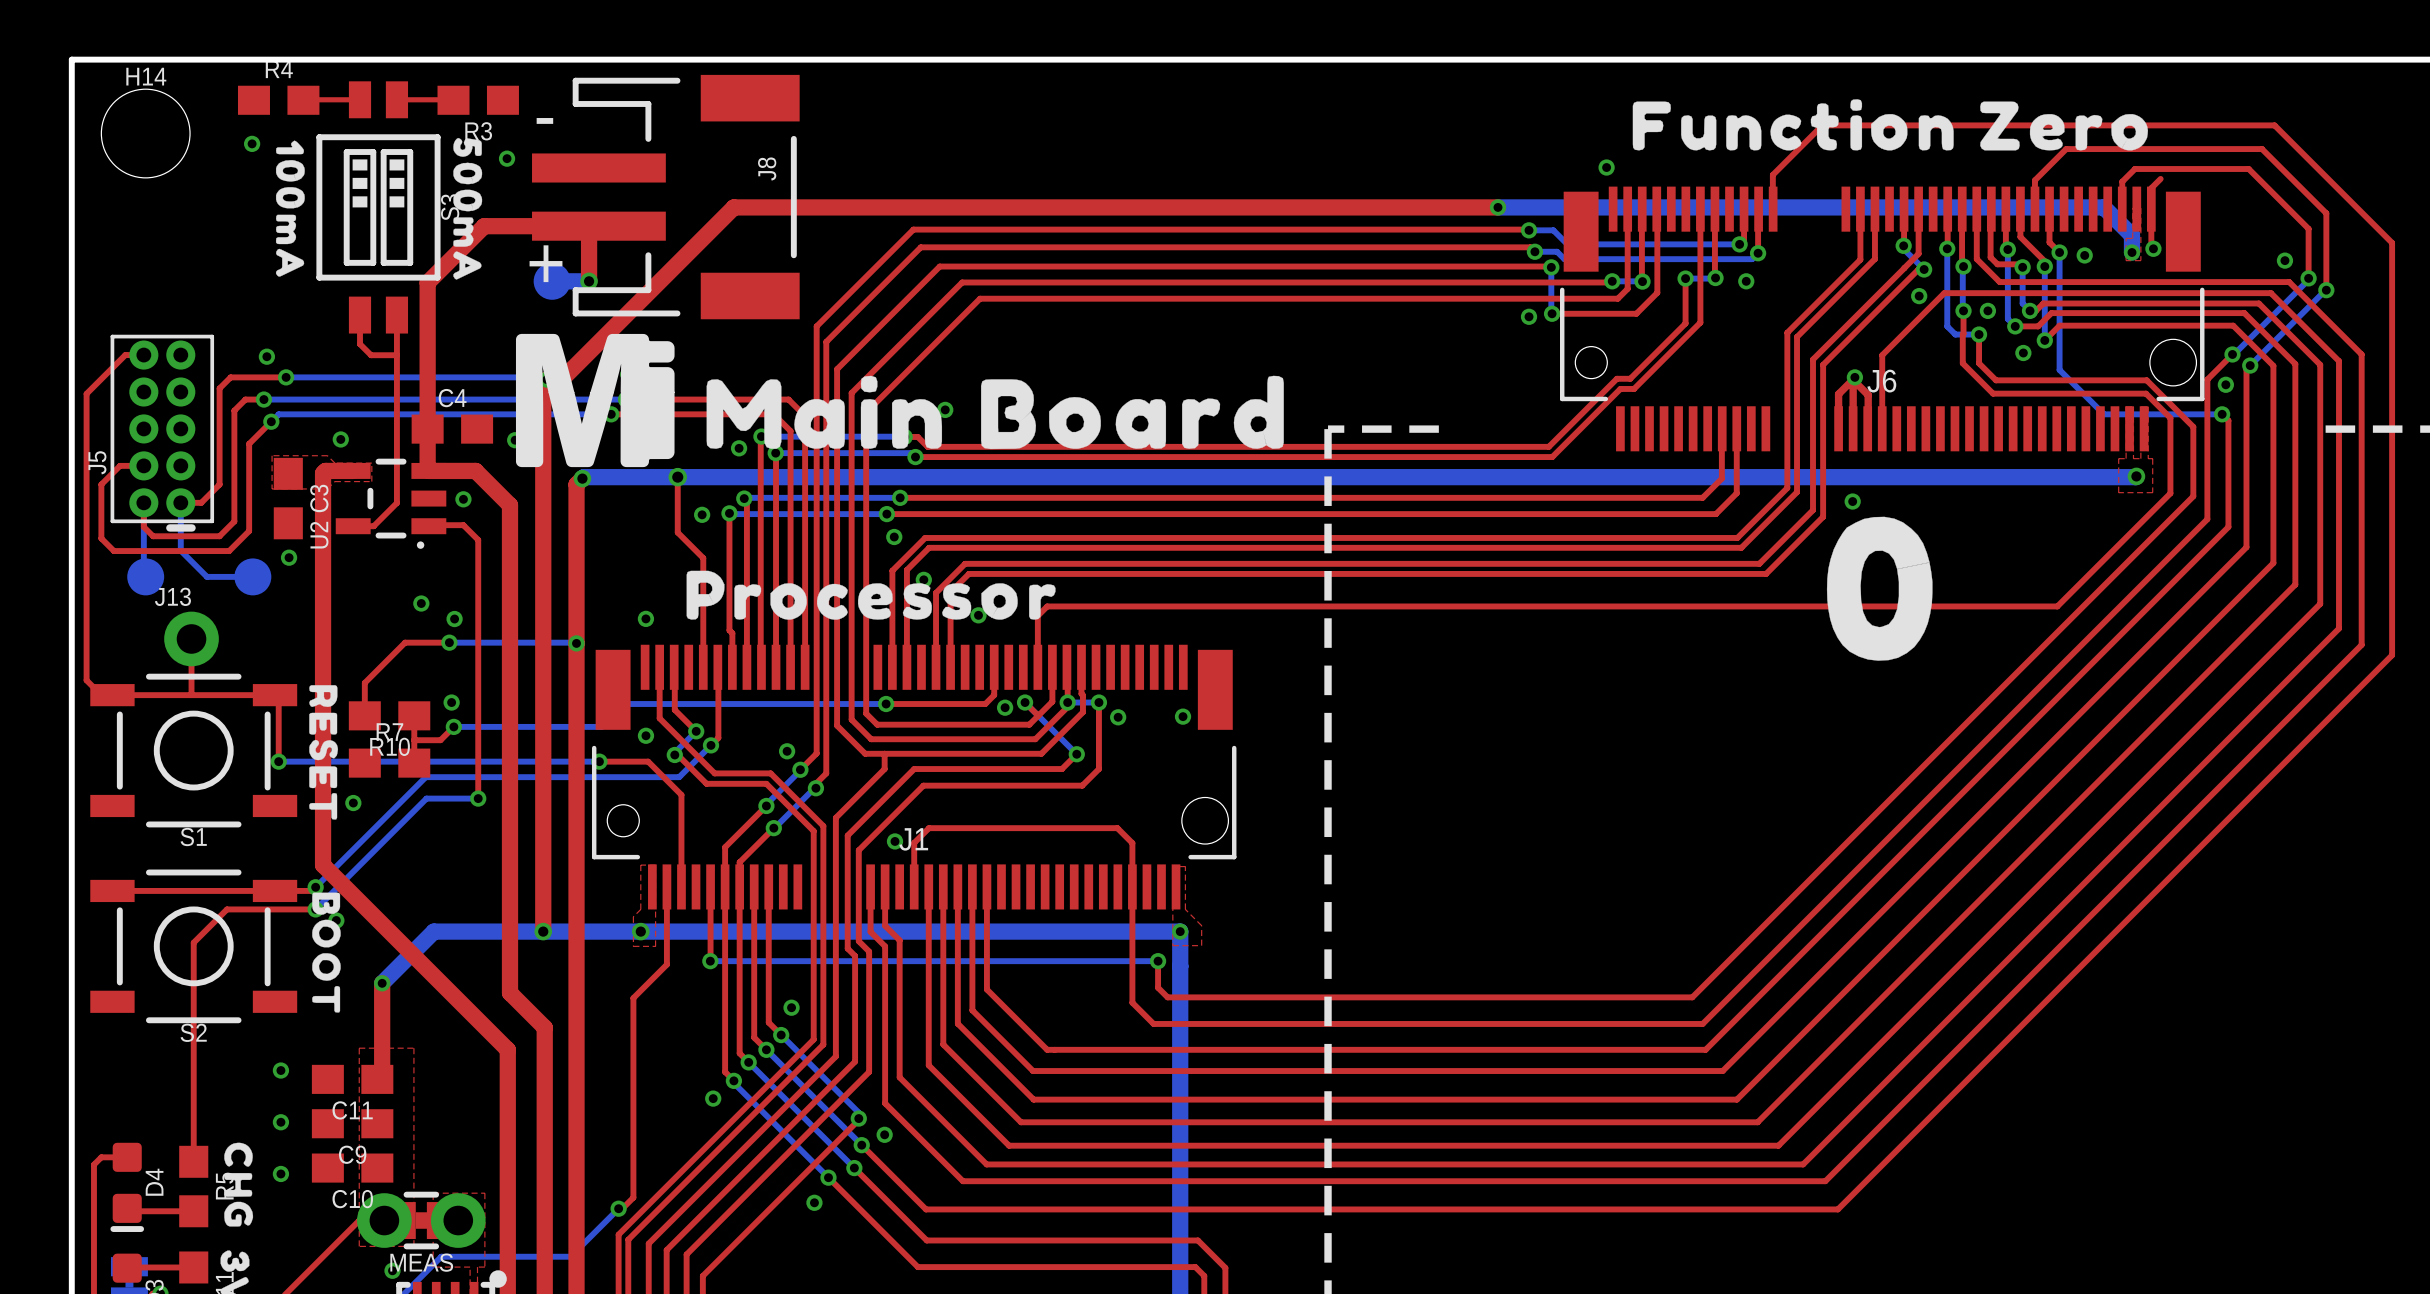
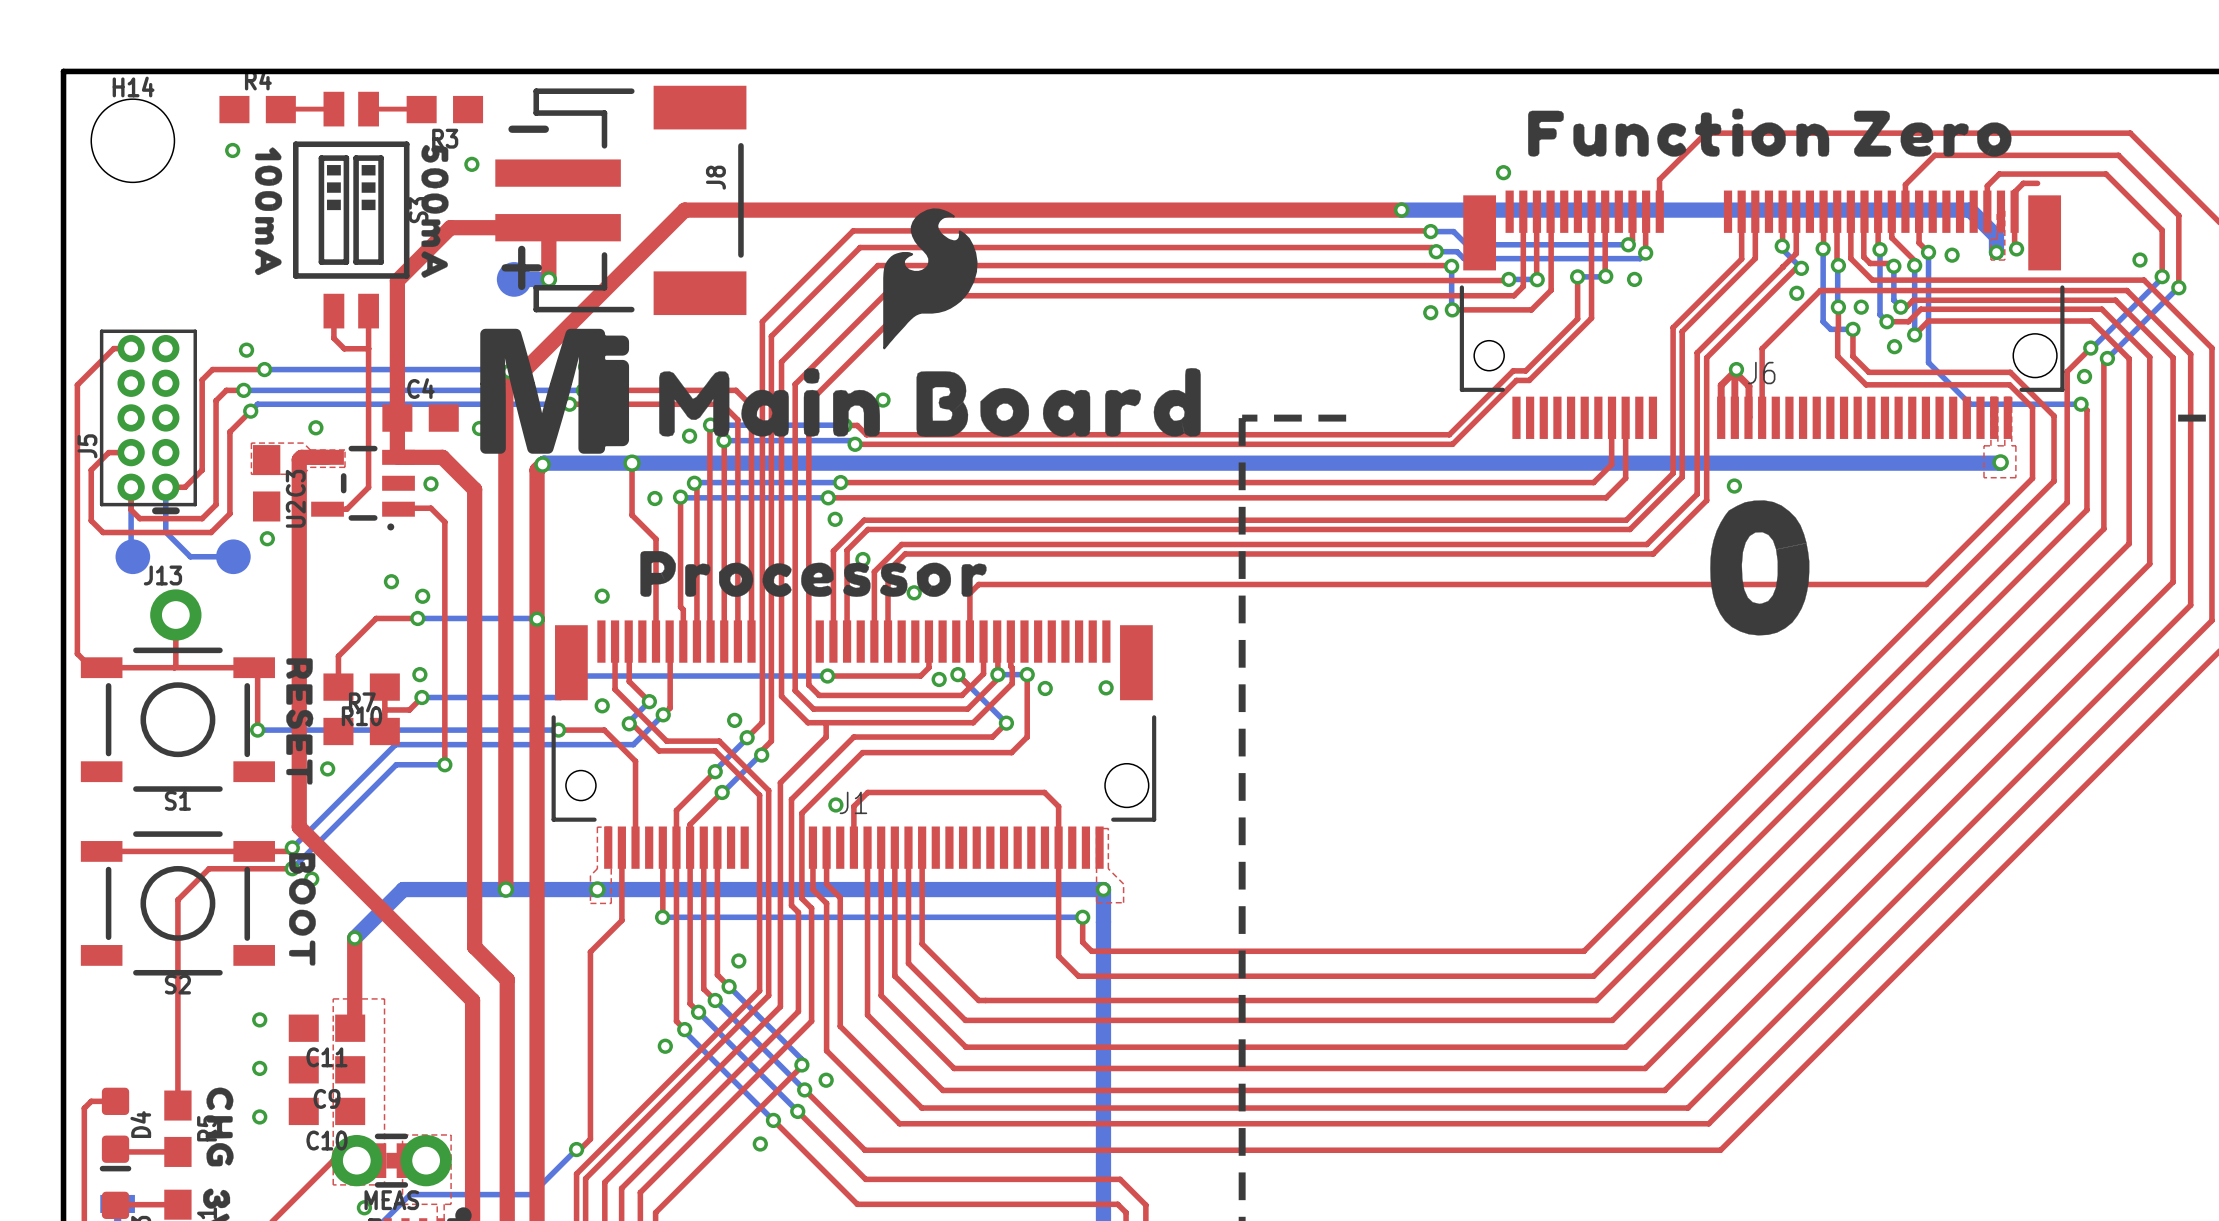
top track: none -> (2023, 183) (2037, 183)
drawing: none -> [883, 208, 978, 350]

